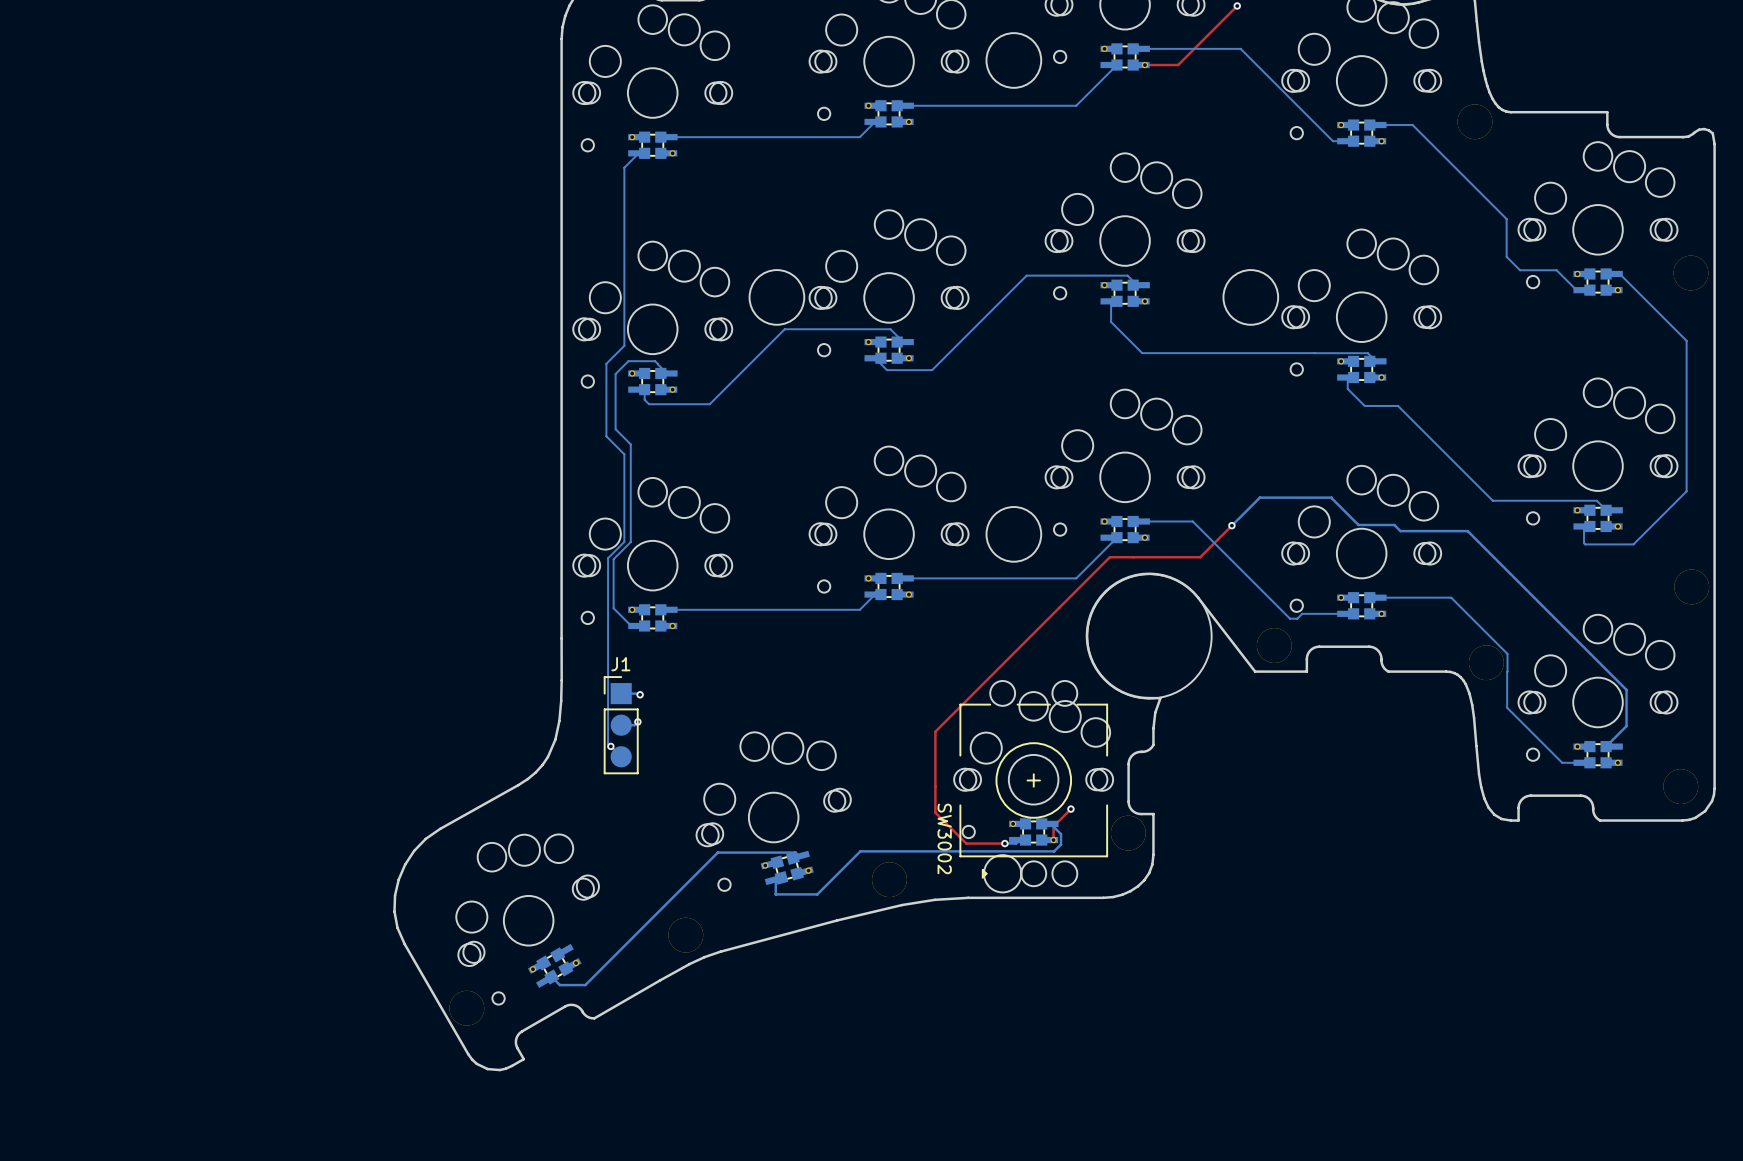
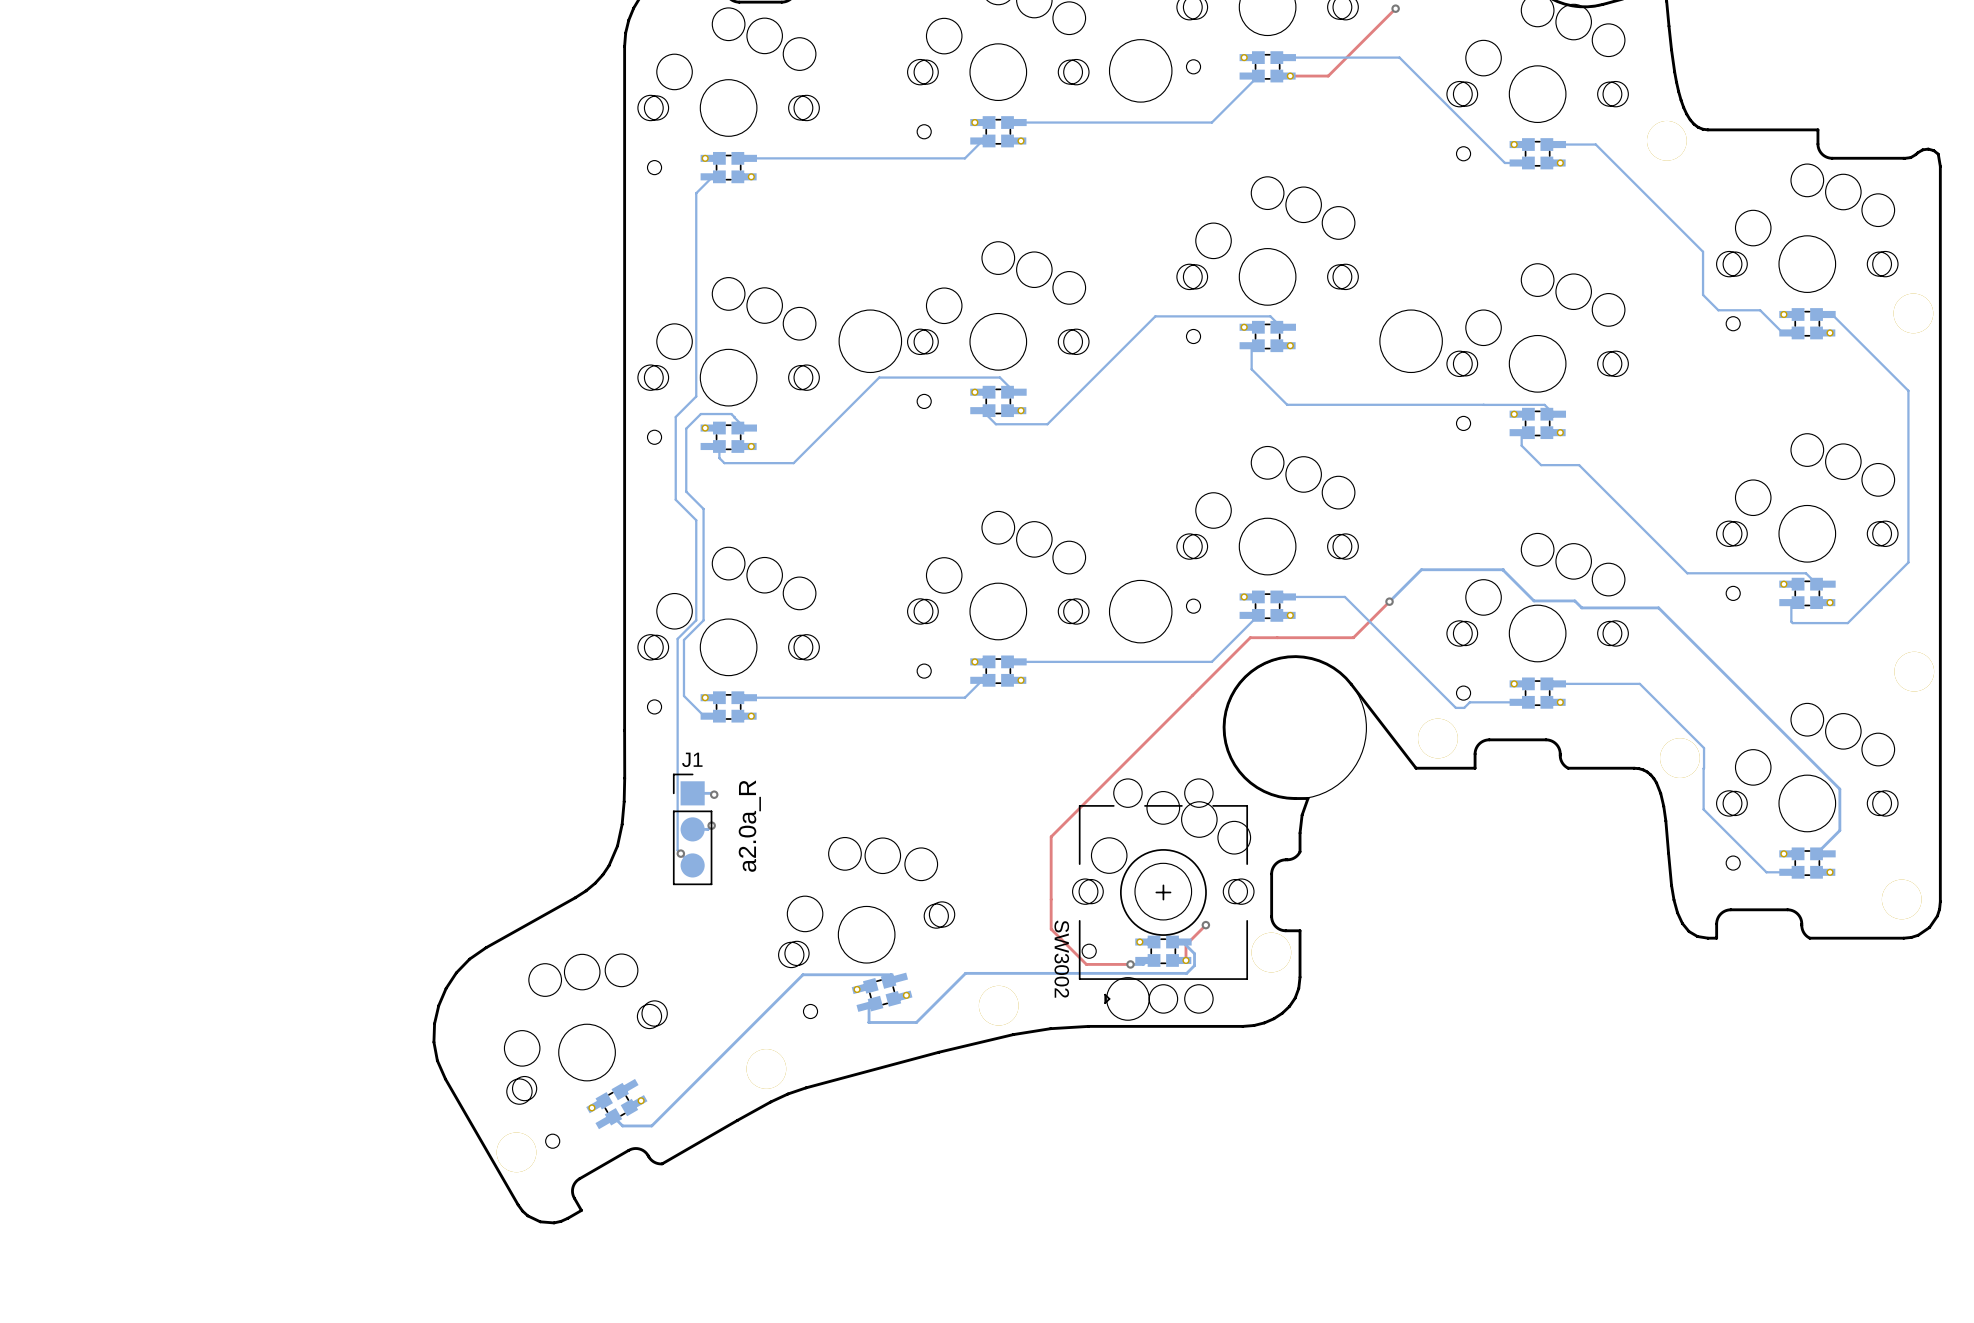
text: none -> a2.0a_R (749, 826)

